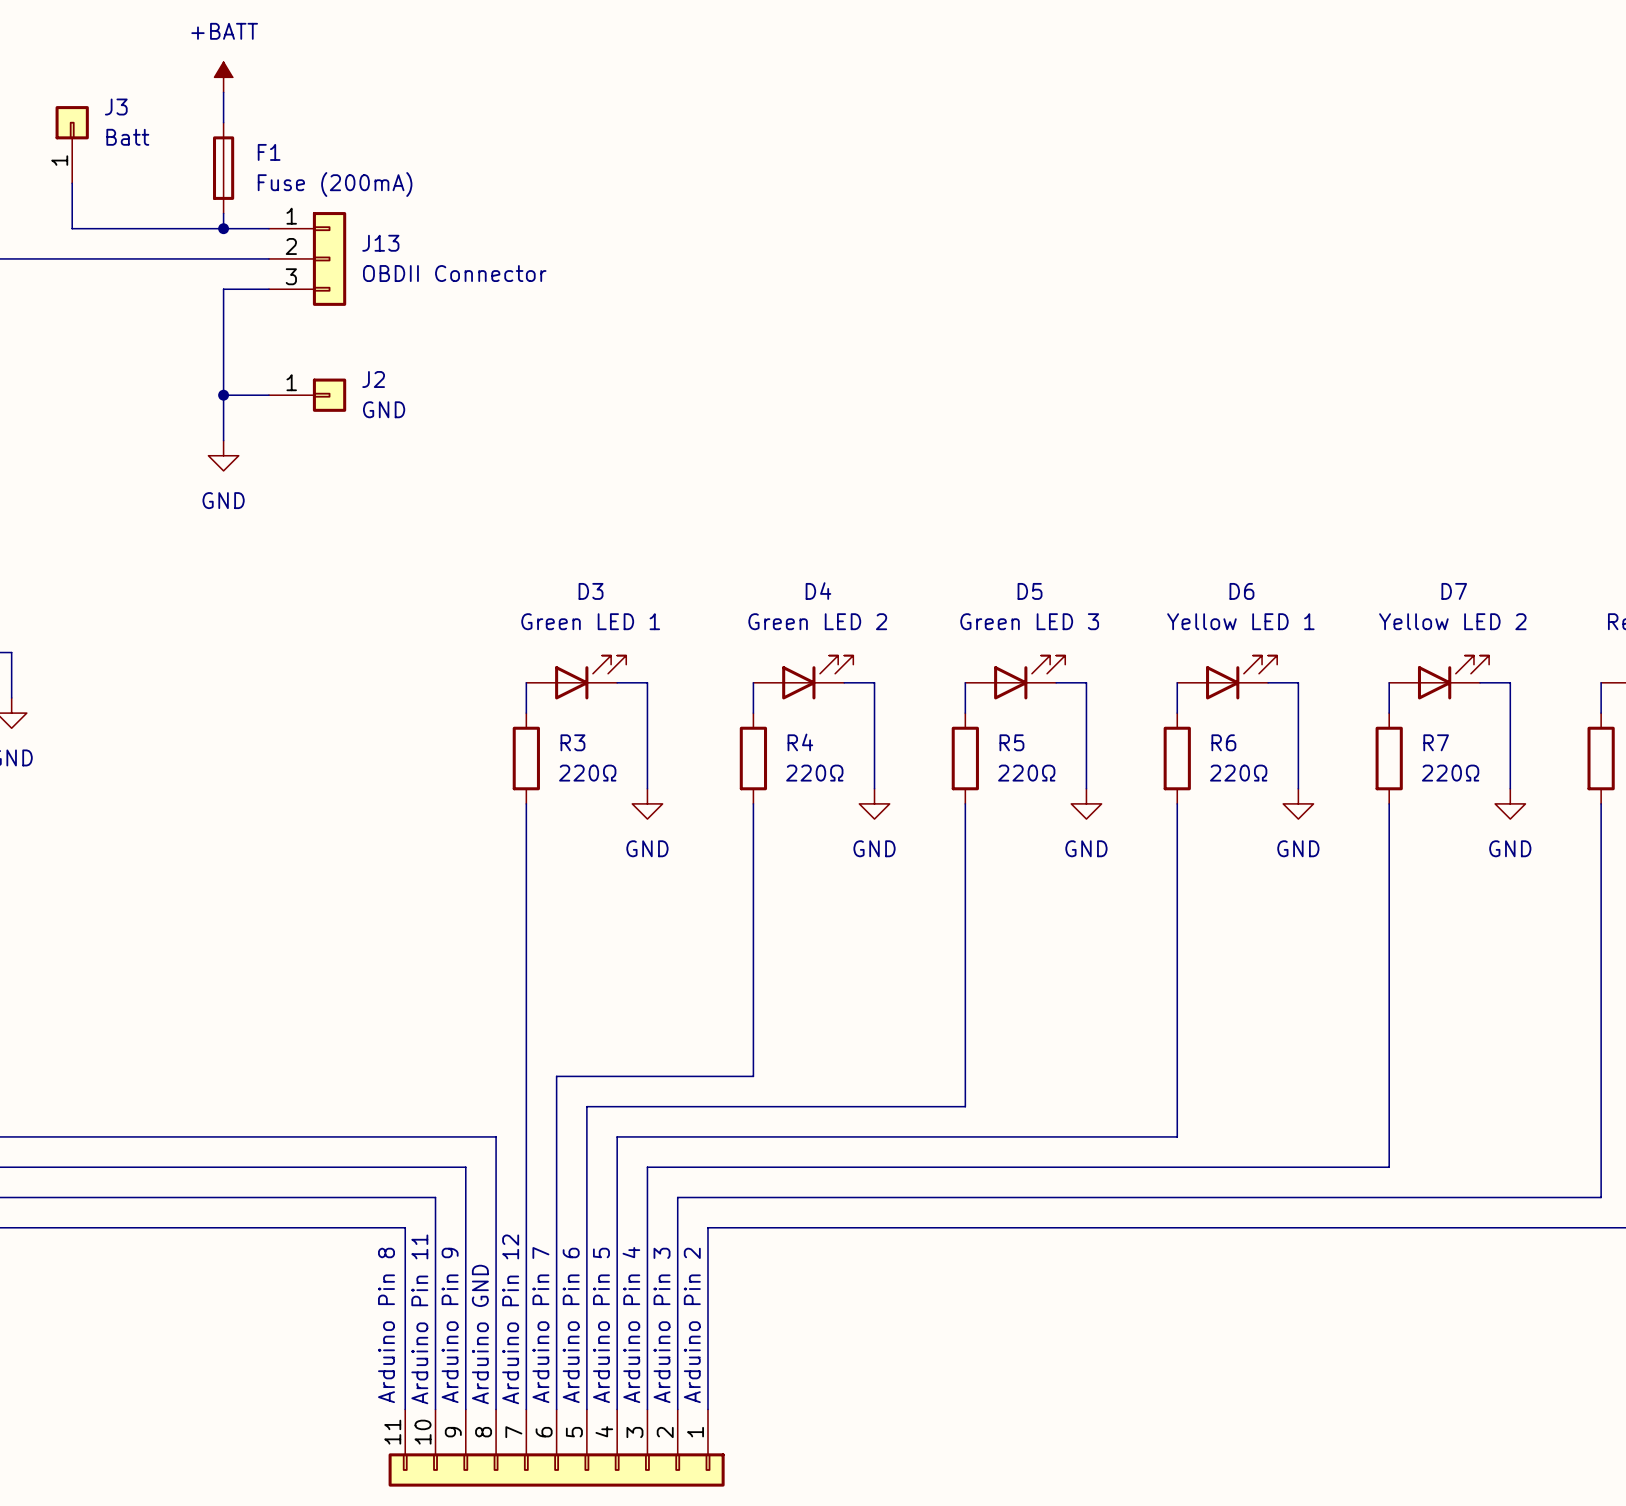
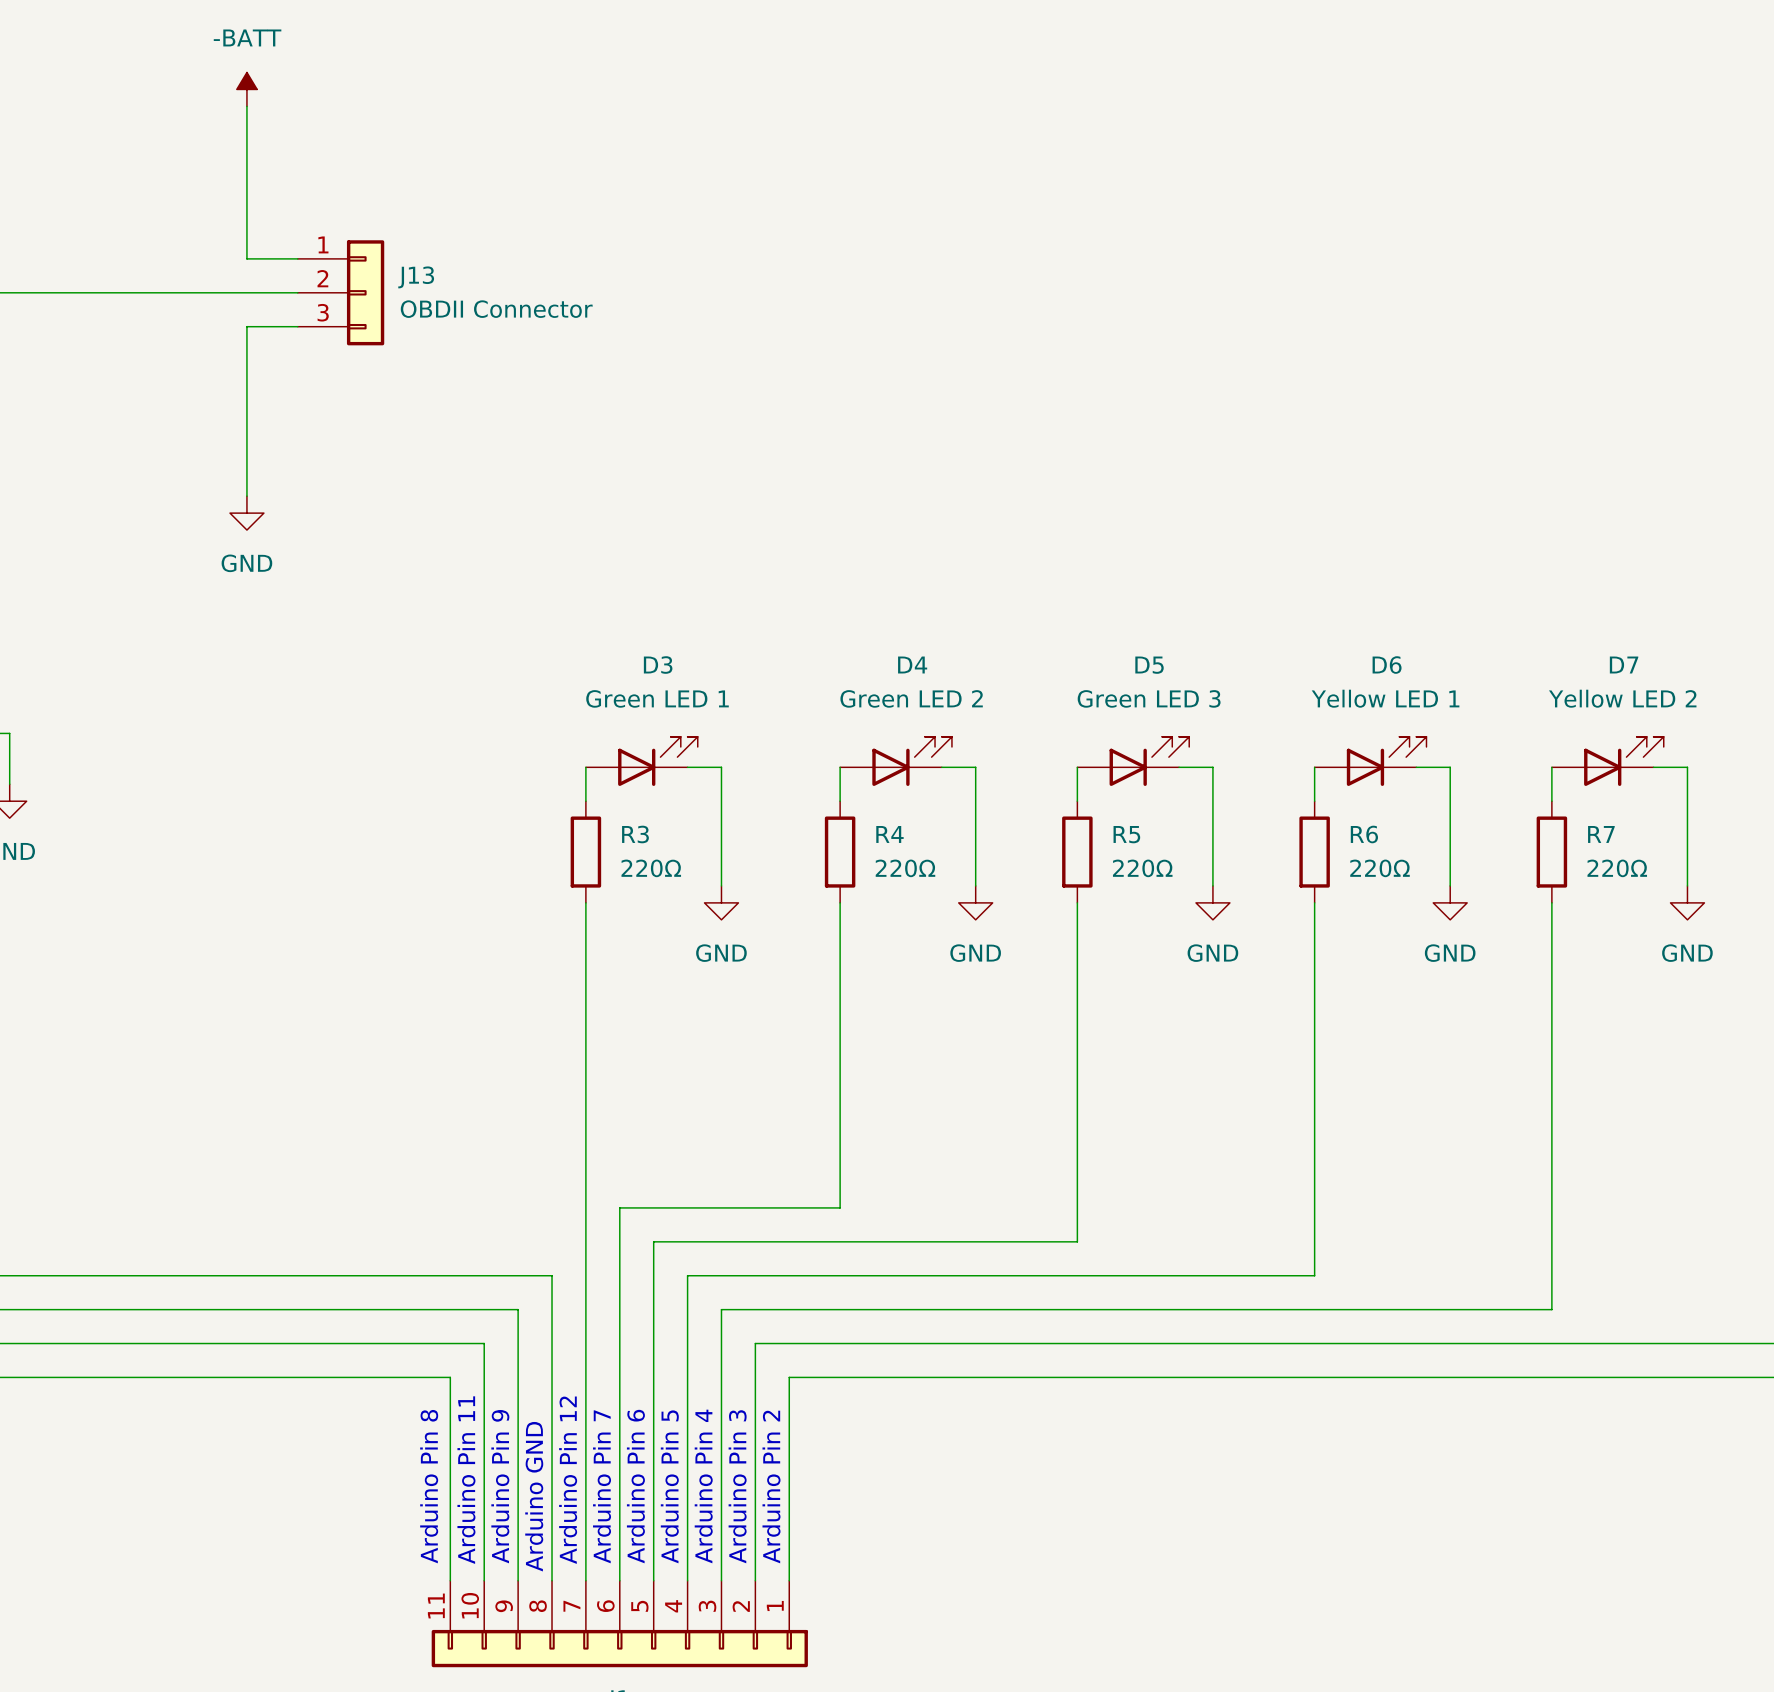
power symbol: +BATT (223, 77) -> -BATT (246, 89)
J3: Batt (72, 144) -> none
F1: Fuse (200mA) (223, 168) -> none
wire: (72, 183) (72, 228) (223, 228) -> none
junction: (223, 228) -> none
wire: (223, 395) (269, 395) -> none
junction: (223, 395) -> none
J2: GND (307, 395) -> none

